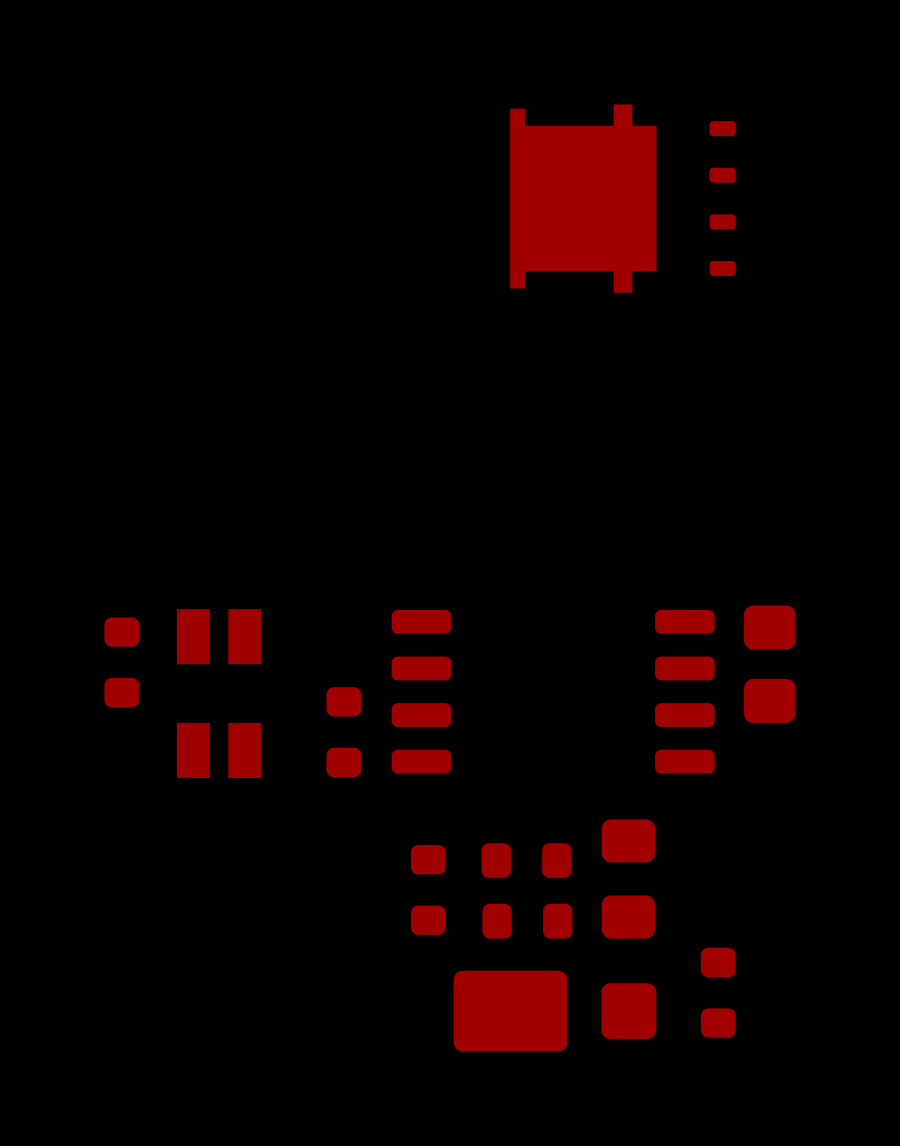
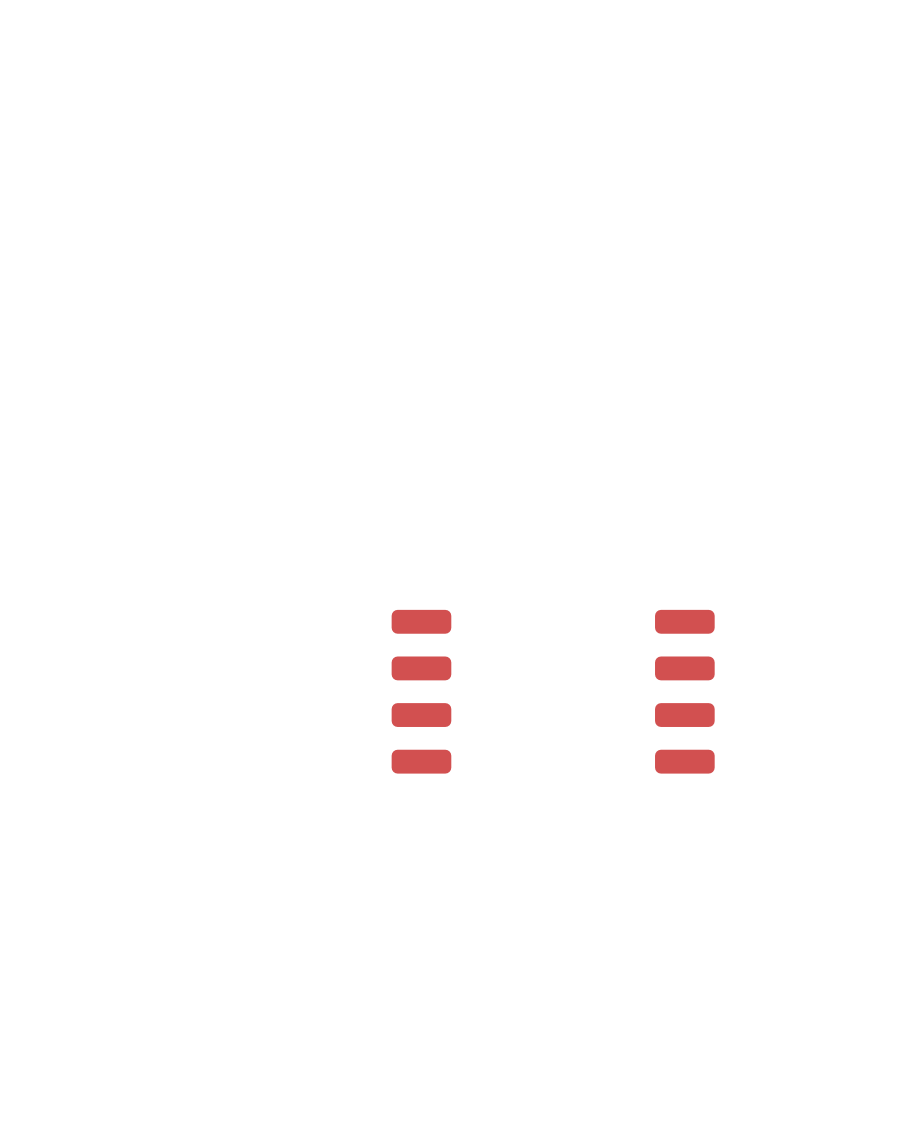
part: (622, 198) -> none
part: (121, 662) -> none
part: (769, 664) -> none
part: (219, 693) -> none
part: (343, 732) -> none
part: (526, 860) -> none
part: (628, 878) -> none
part: (428, 889) -> none
part: (527, 921) -> none
part: (718, 992) -> none
part: (554, 1011) -> none

